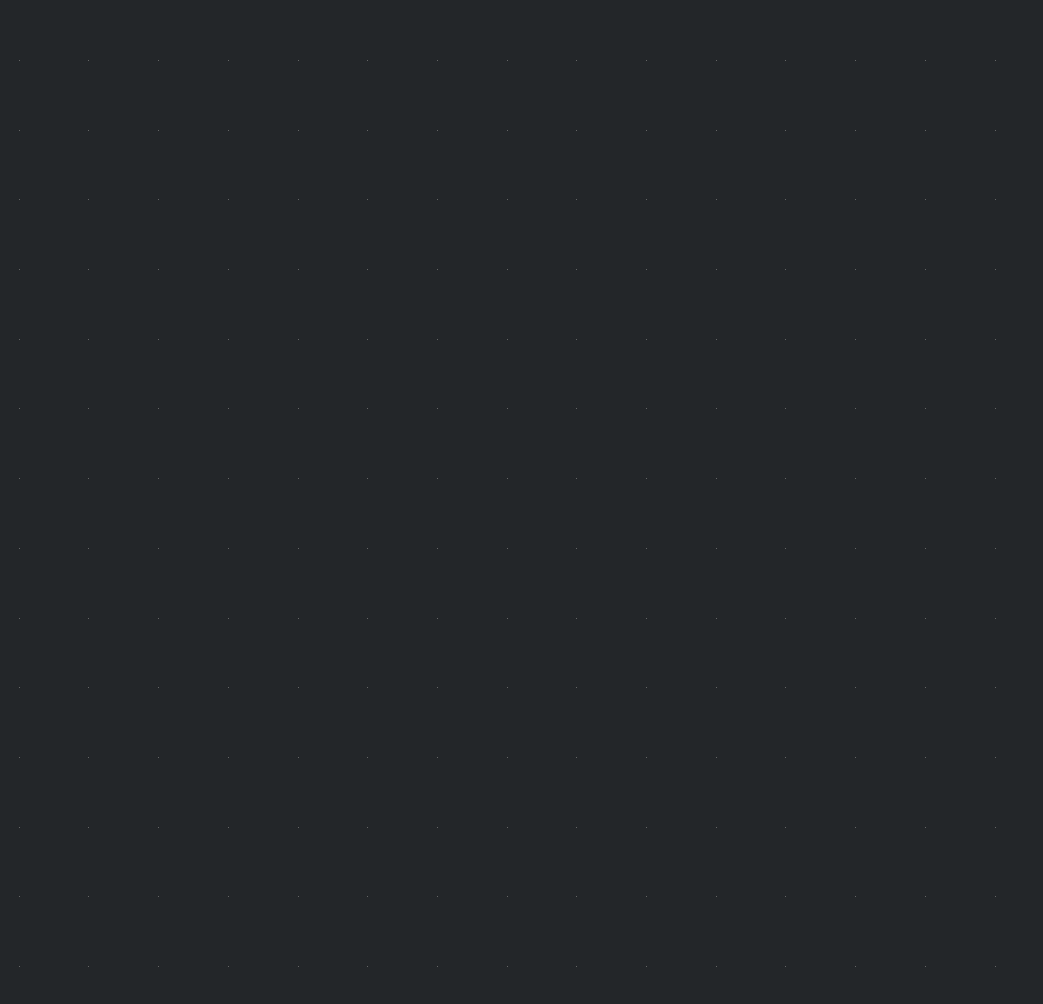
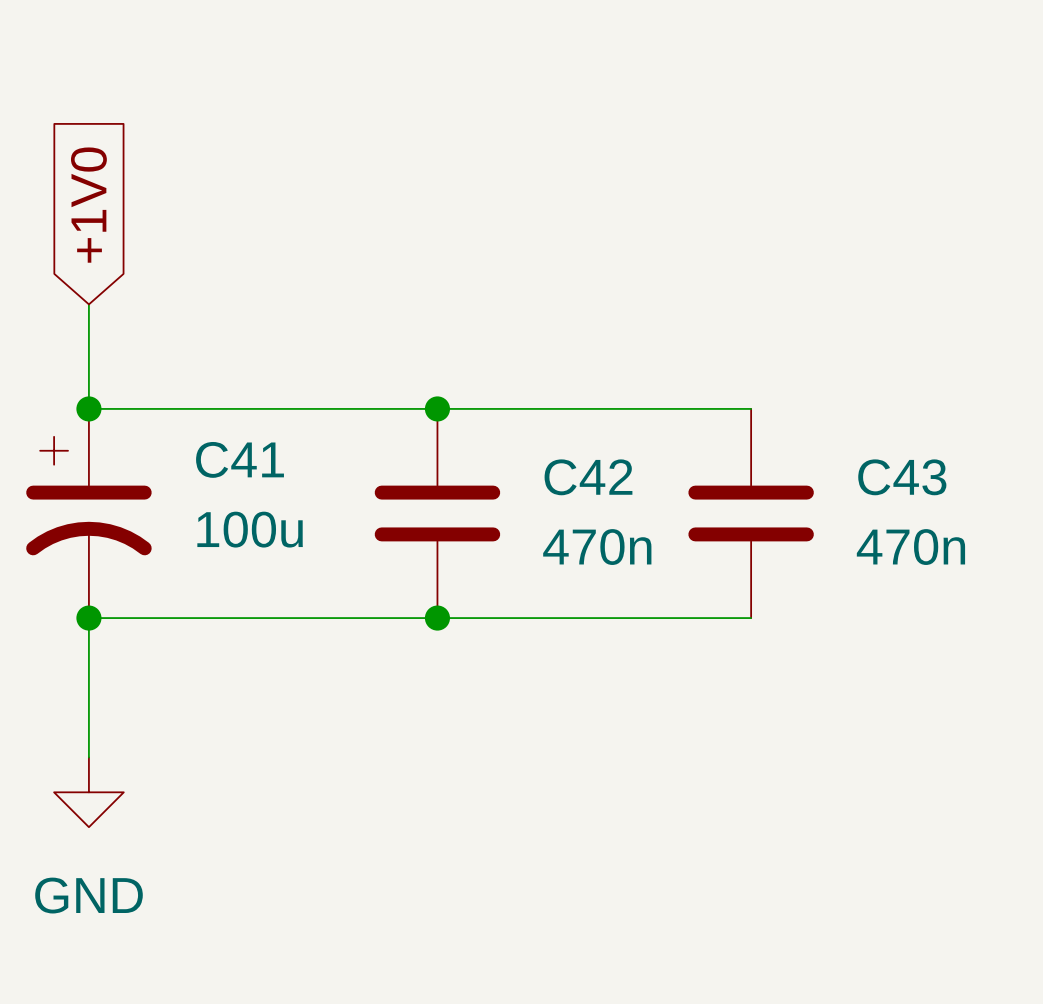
global label: none -> +1V0 (88, 205)
wire: none -> (88, 304) (88, 408) (751, 408)
junction: none -> (88, 408)
junction: none -> (437, 408)
C41: none -> 100u (88, 513)
C42: none -> 470n (437, 513)
C43: none -> 470n (751, 513)
junction: none -> (88, 618)
junction: none -> (437, 618)
wire: none -> (751, 618) (88, 618) (88, 757)
power symbol: none -> GND (88, 792)

